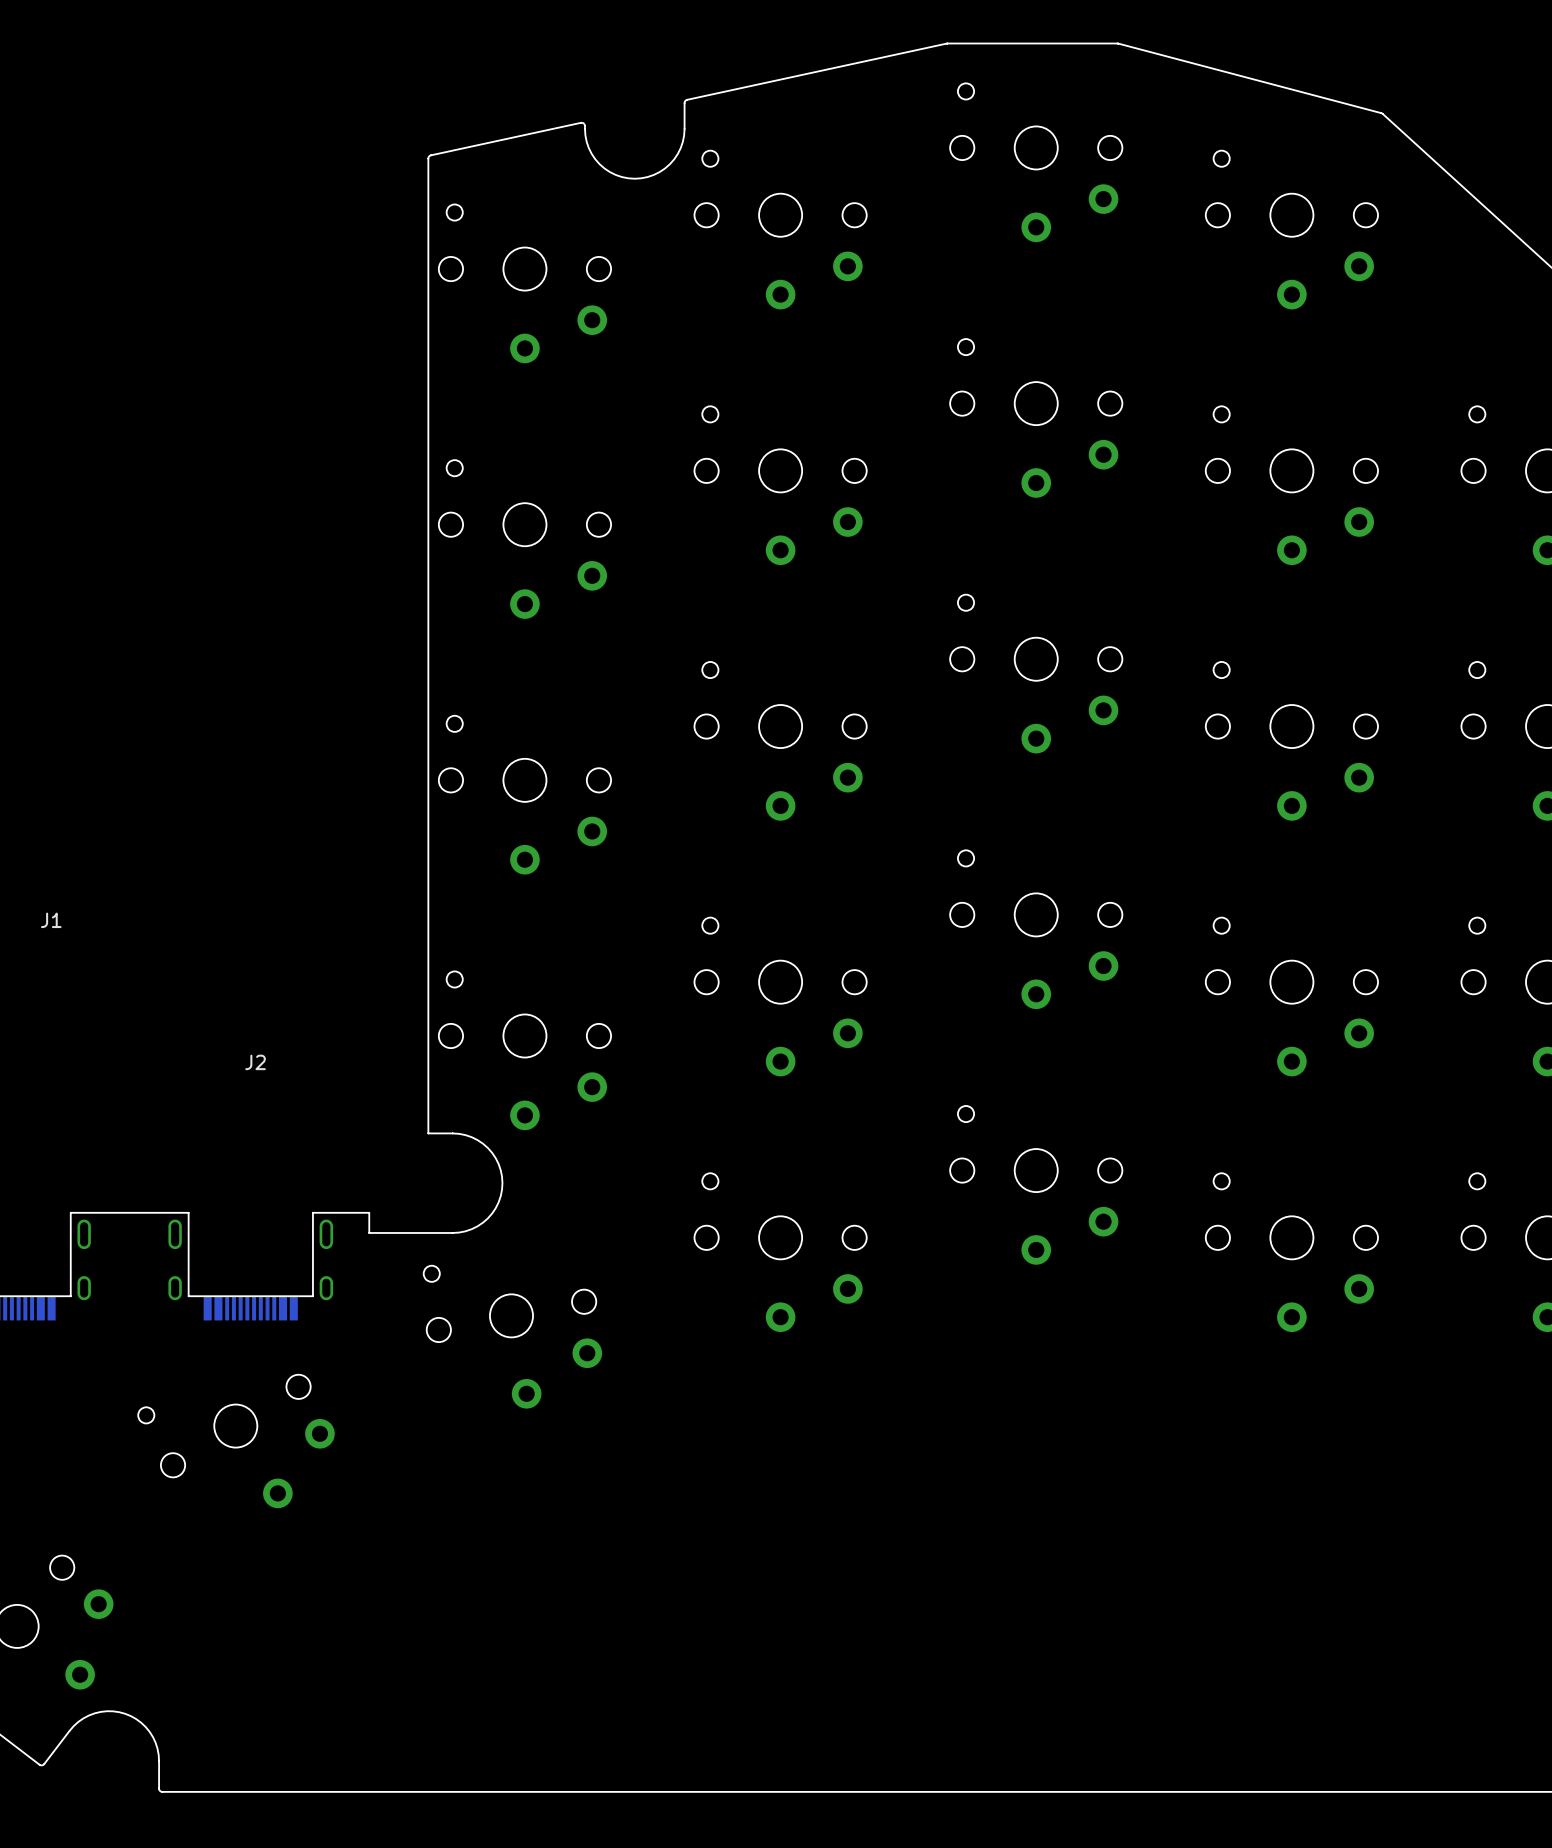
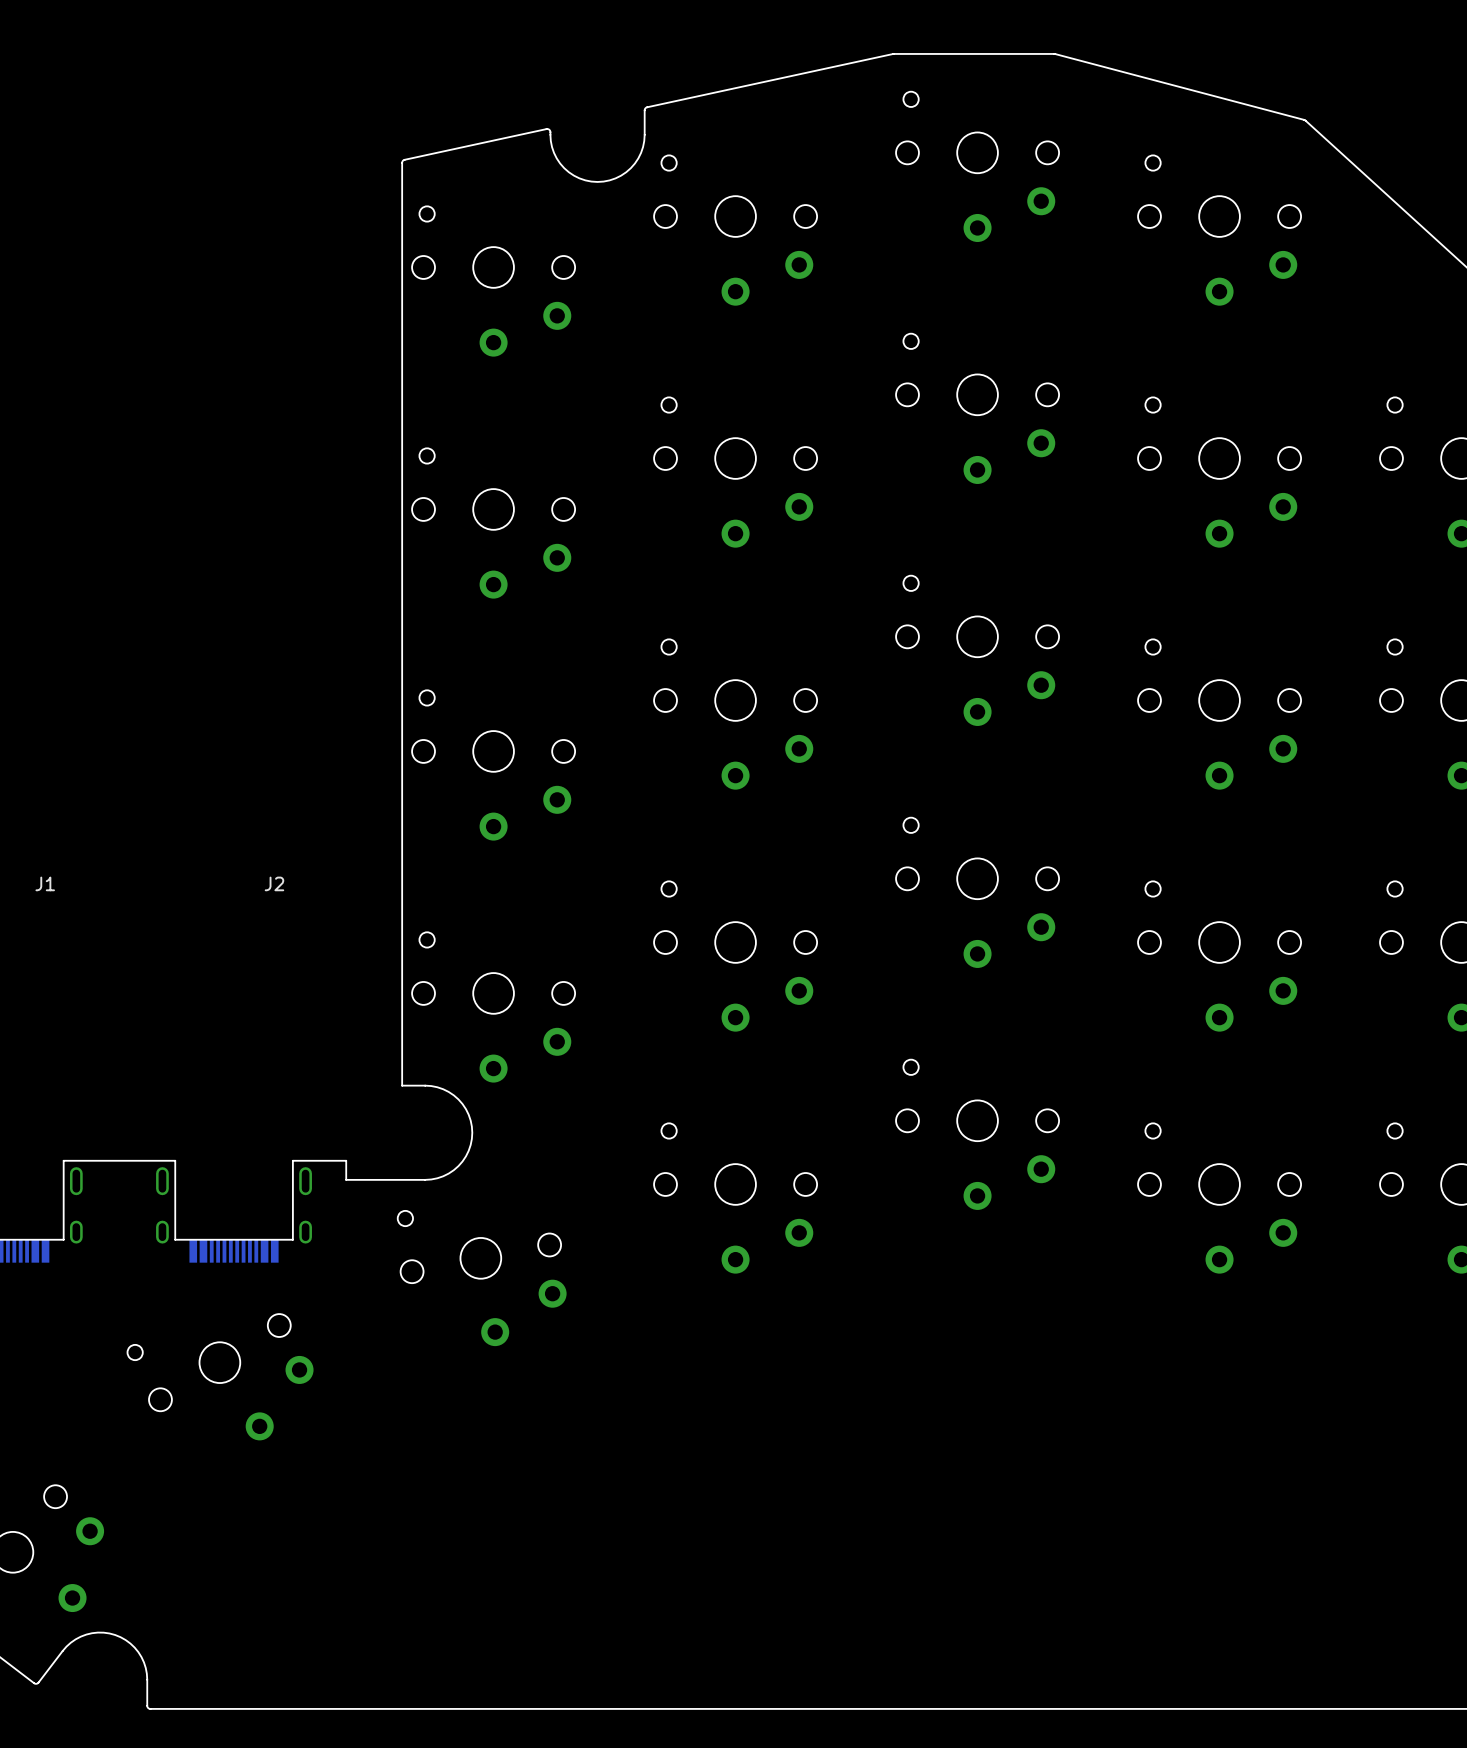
J2 name position: J2 (255, 1062) -> J2 (274, 883)

